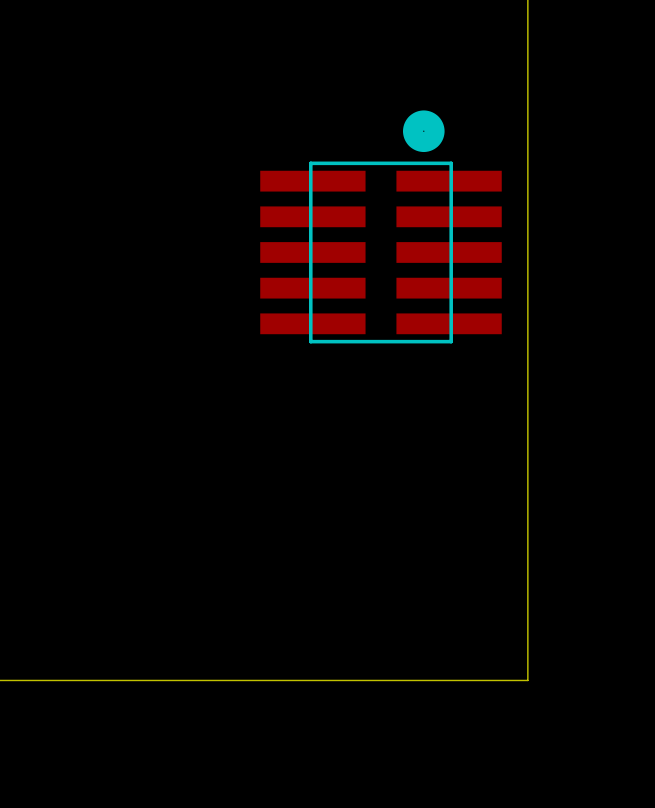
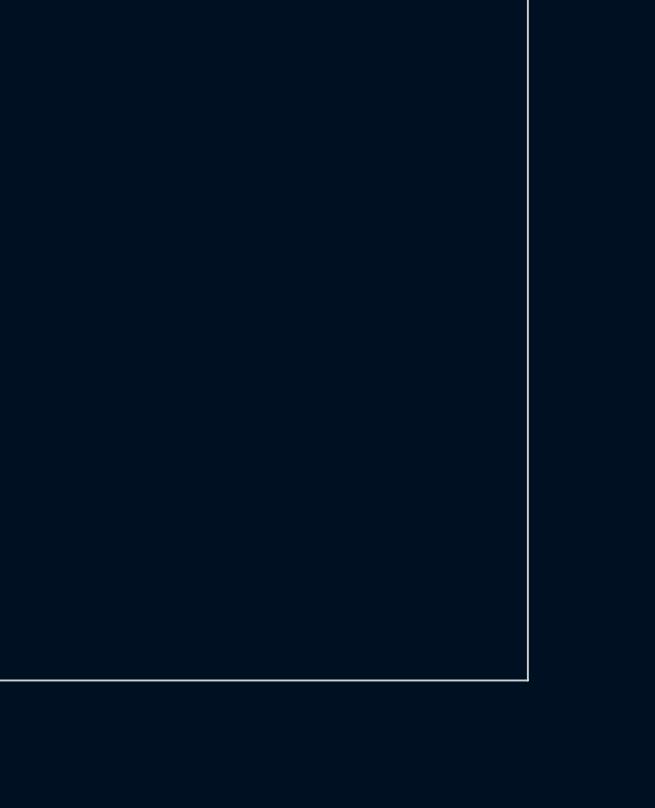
part: (380, 226) -> none

